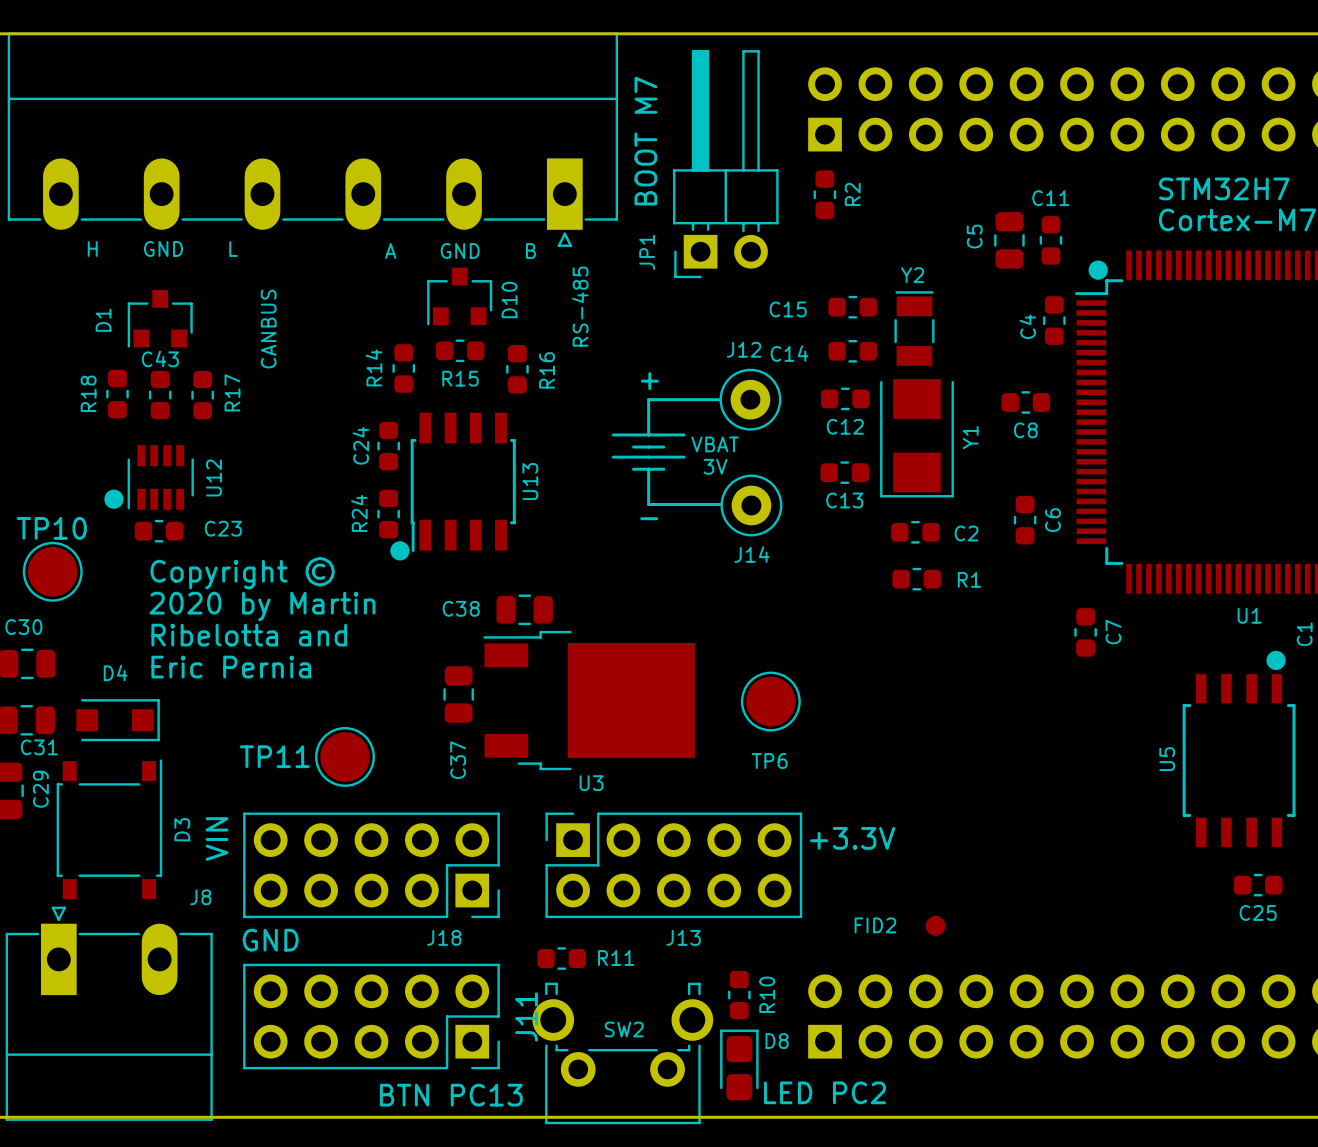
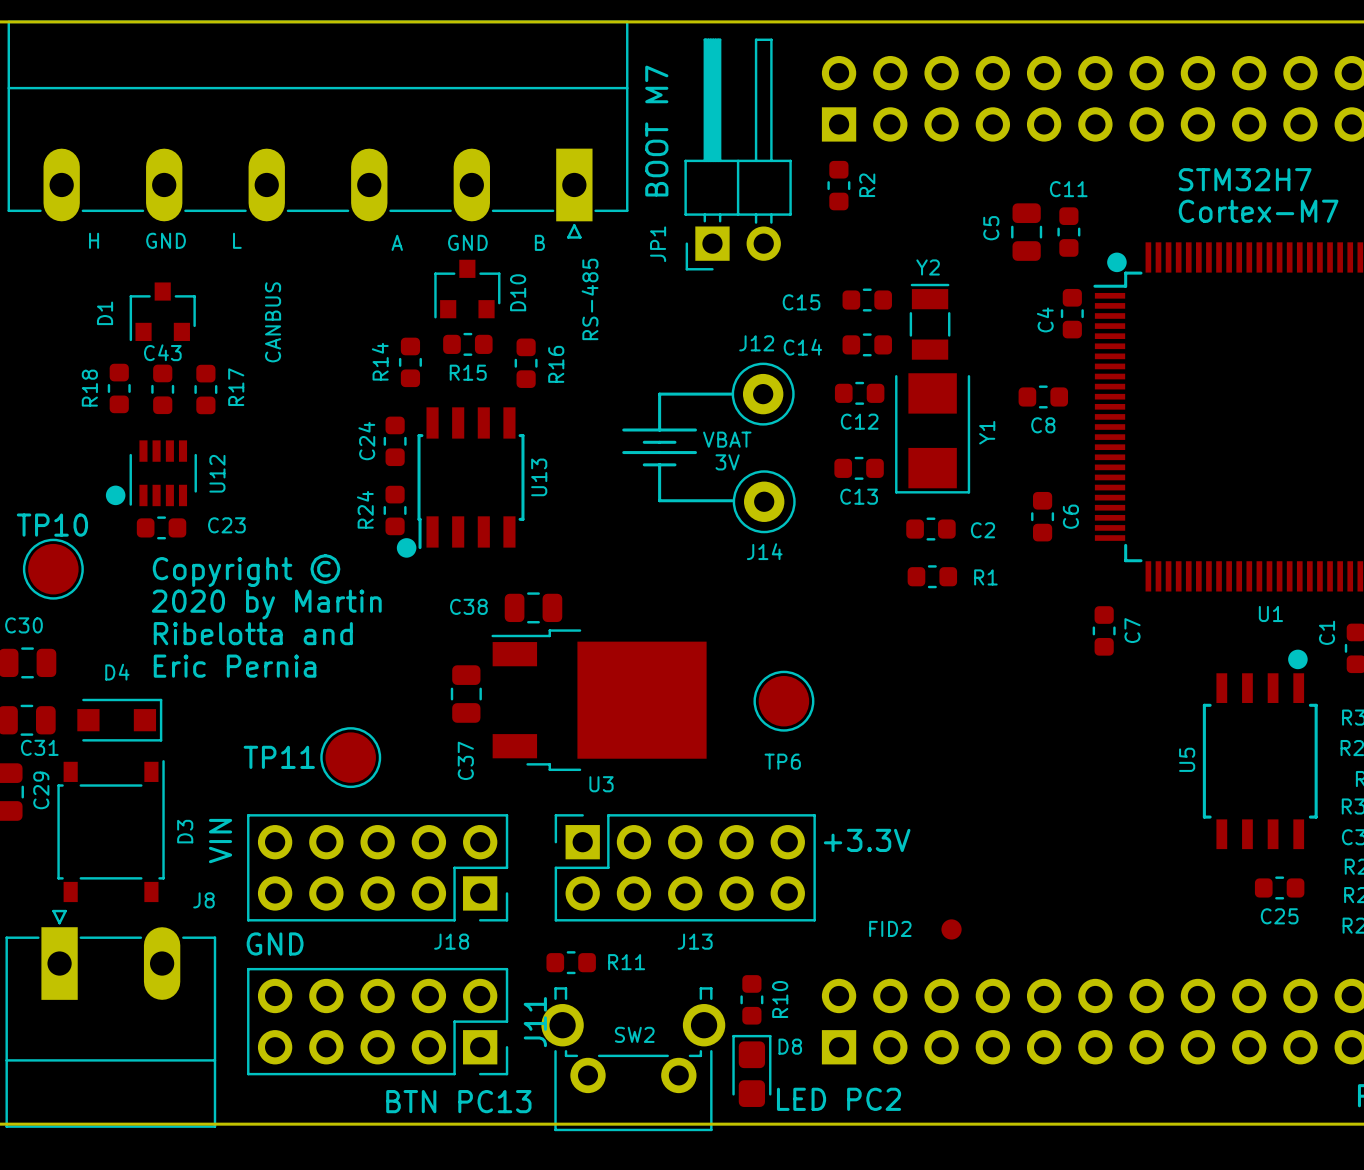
text: + (649, 381) -> none
text: - (649, 518) -> none

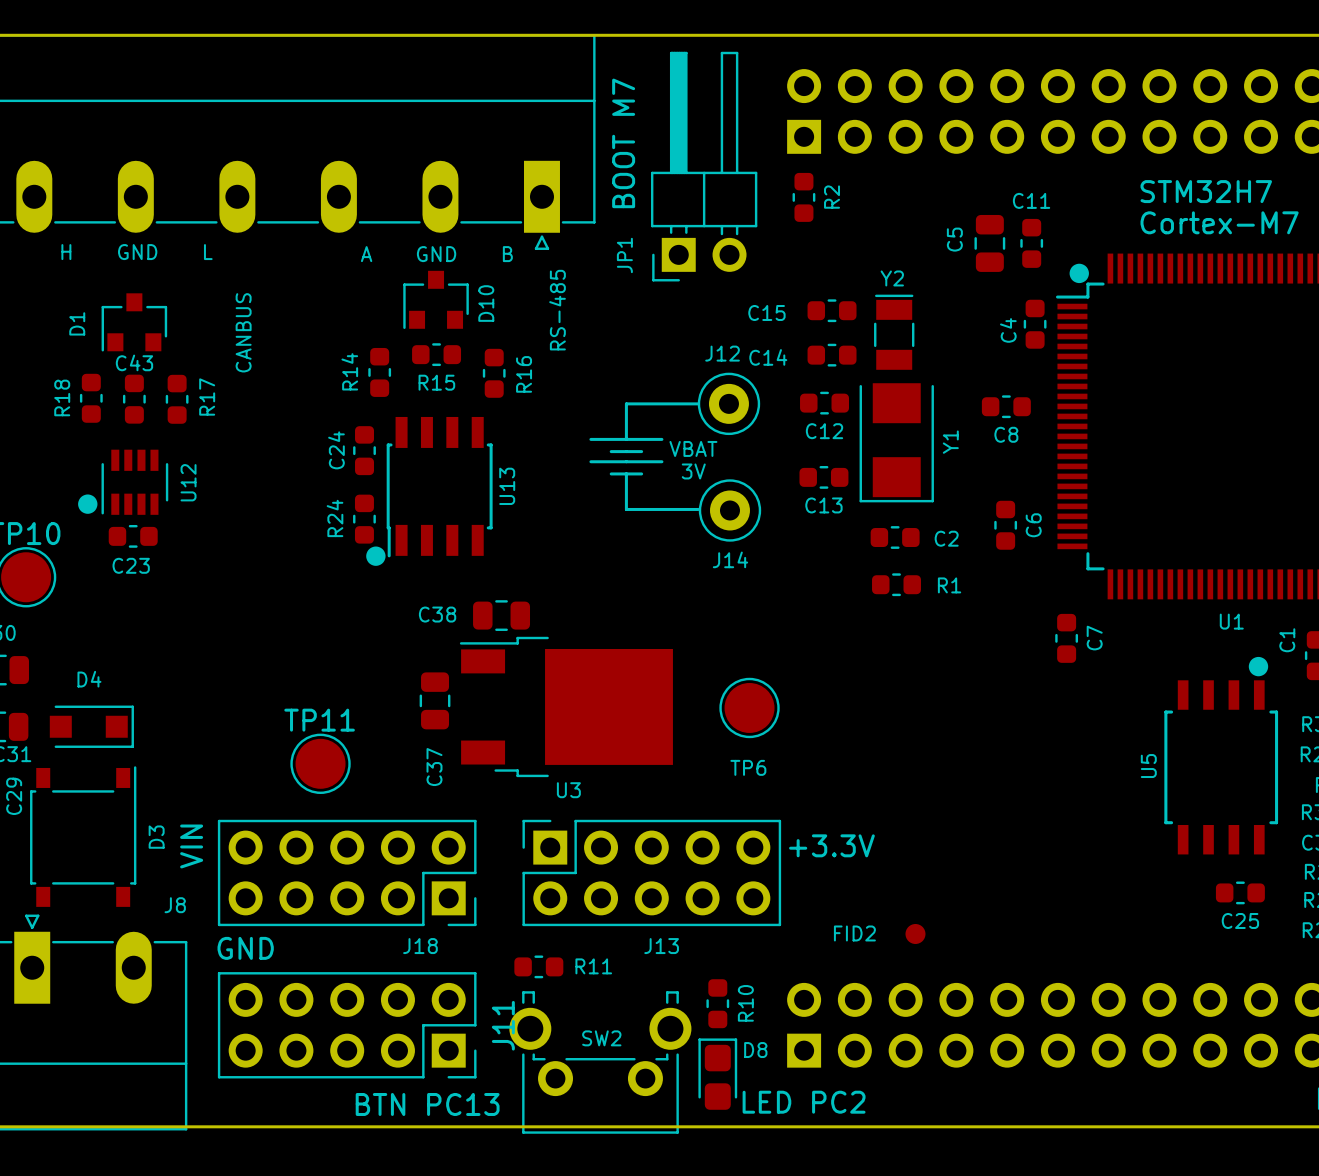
C23 name position: C23 (226, 525) -> C23 (131, 565)
text: Copyright © (246, 570) -> none
text: 2020 by Martin (266, 604) -> none
text: Ribelotta and (253, 633) -> none
text: Eric Pernia (235, 666) -> none
TP11 name position: TP11 (279, 757) -> TP11 (319, 720)

